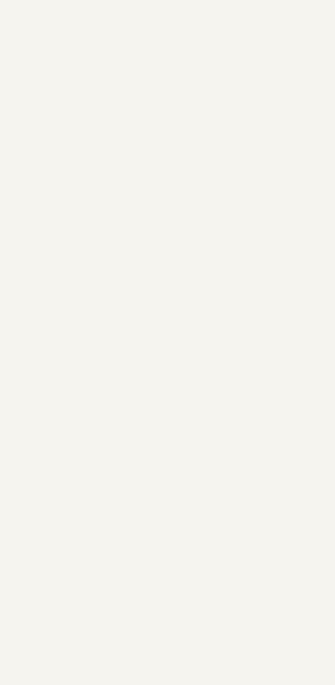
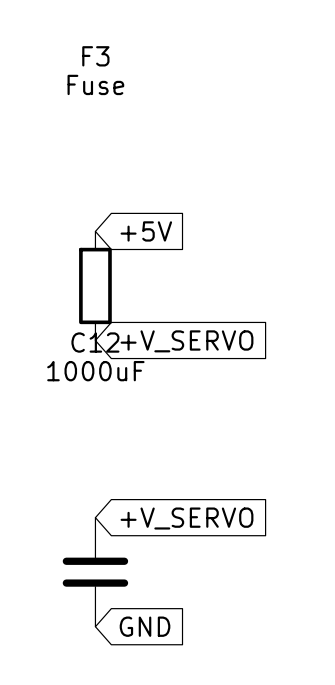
global label: none -> +5V (146, 231)
F3: none -> Fuse (95, 285)
global label: none -> +V_SERVO (186, 341)
global label: none -> +V_SERVO (186, 518)
C12: none -> 1000uF (95, 572)
global label: none -> GND (145, 626)

